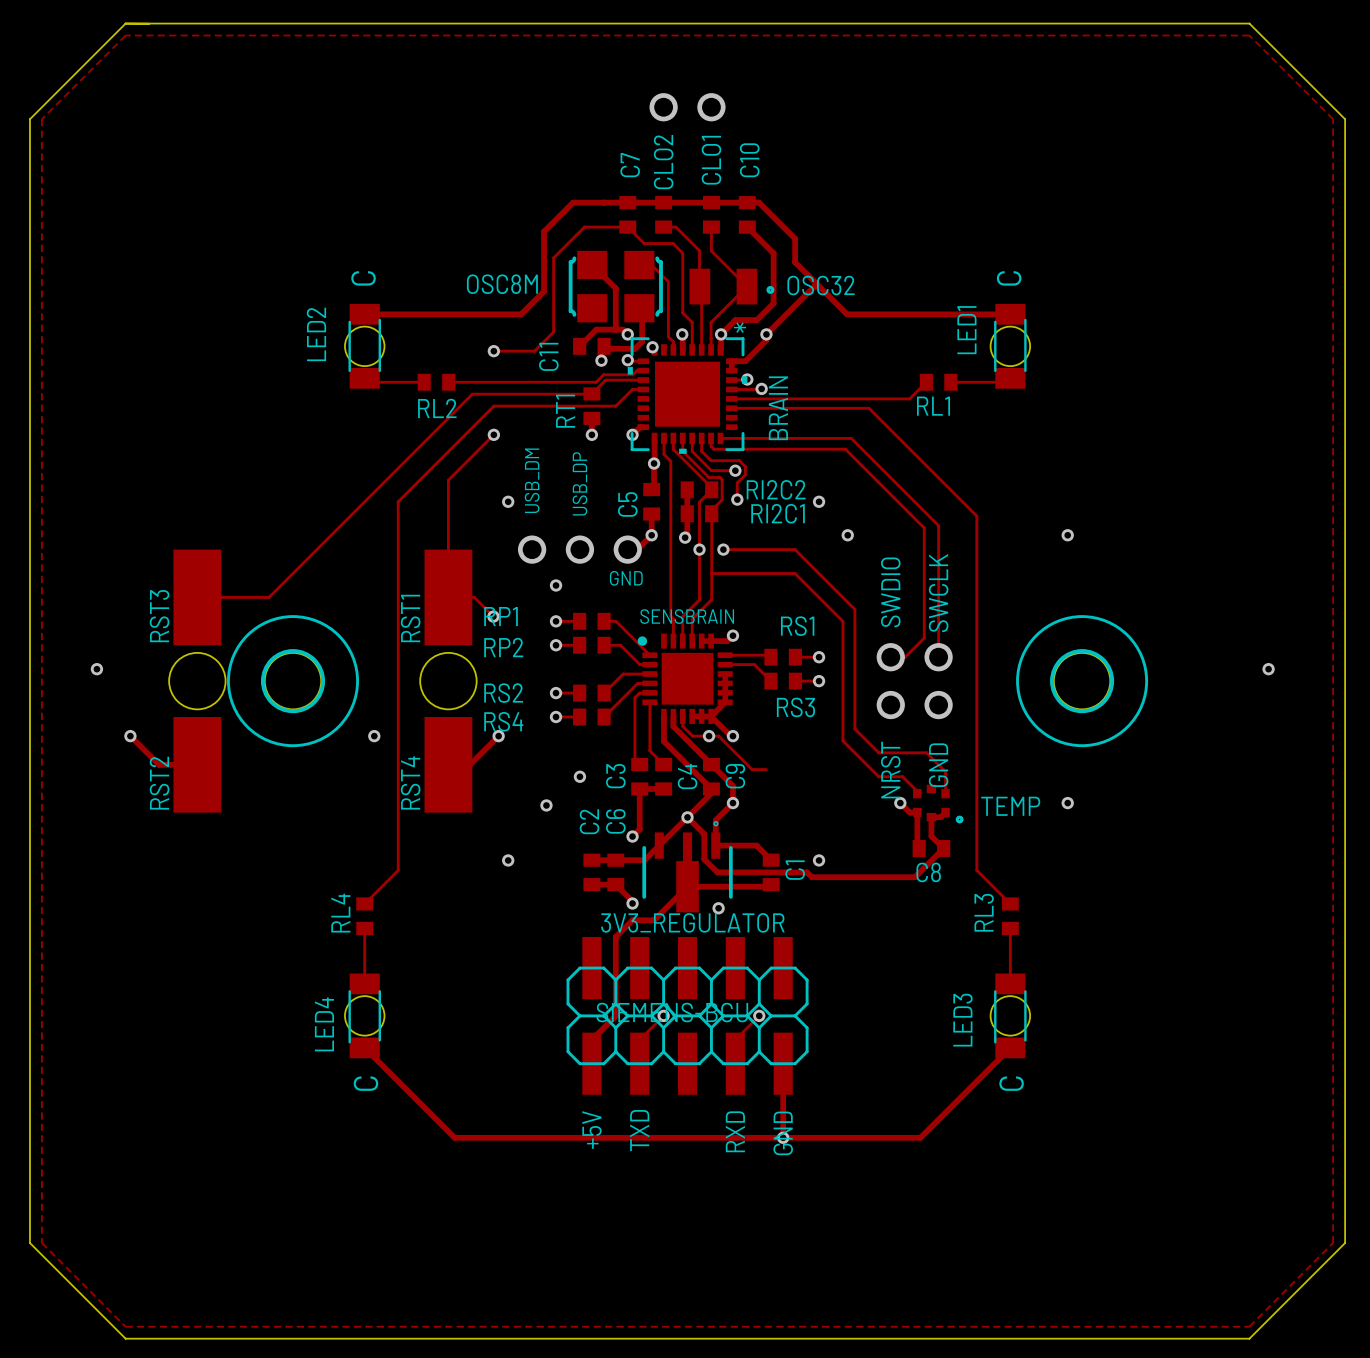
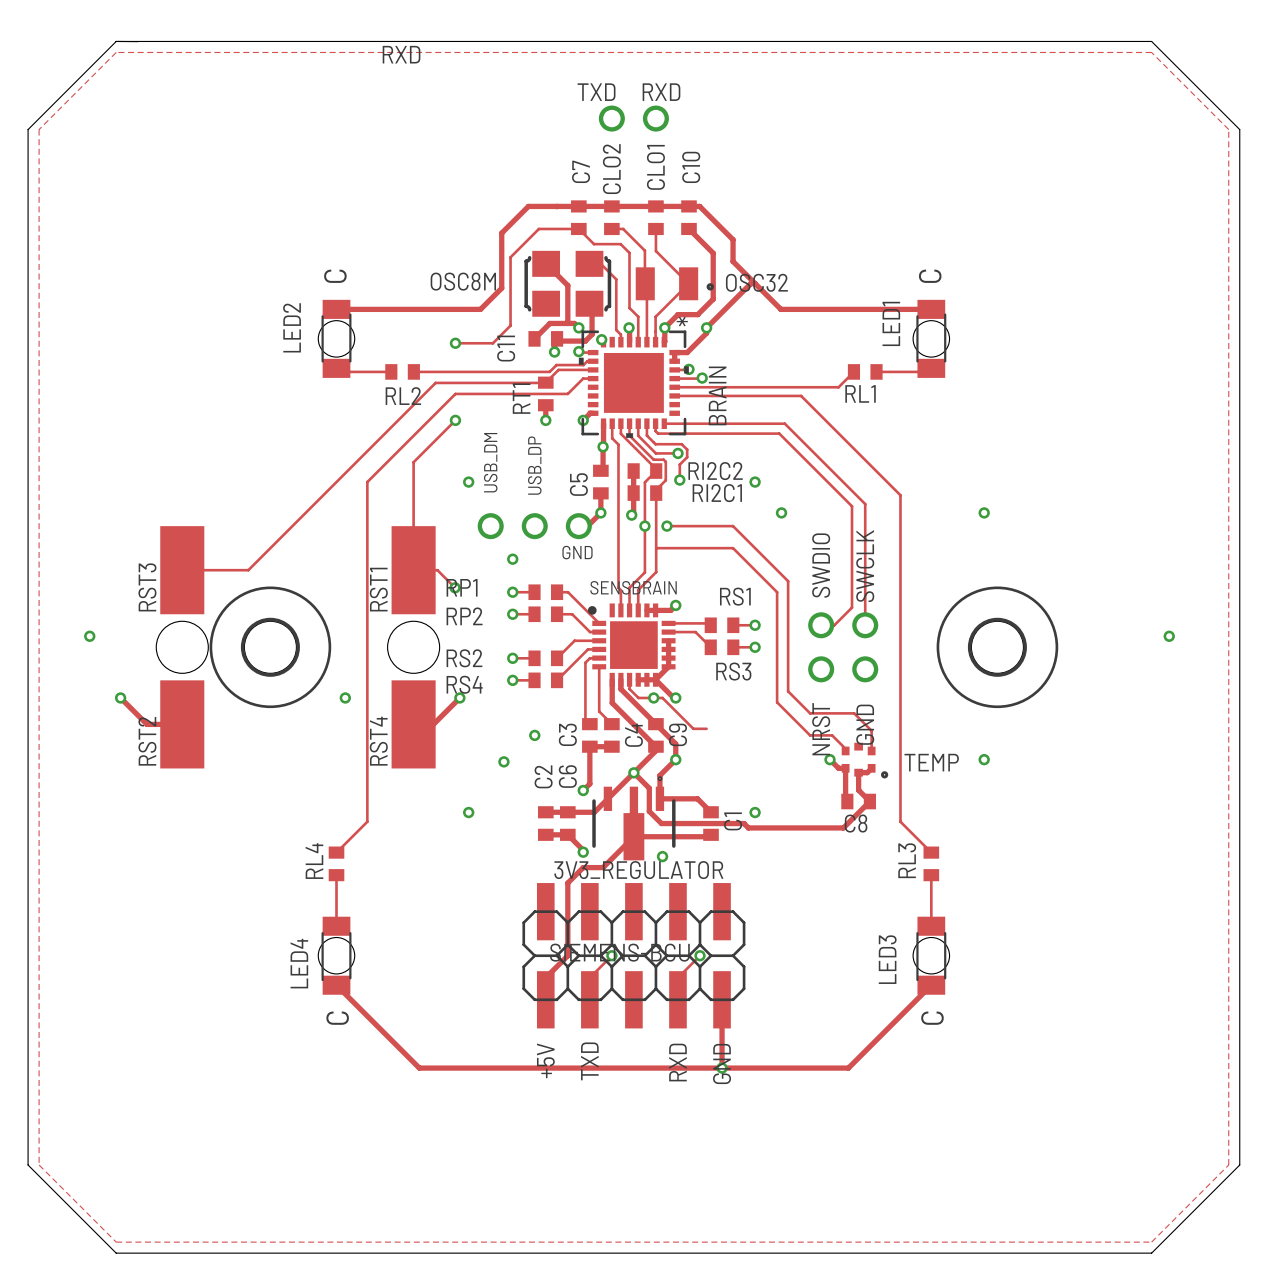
text: none -> RXD (401, 54)
text: none -> TXD (596, 92)
text: none -> RXD (661, 92)

